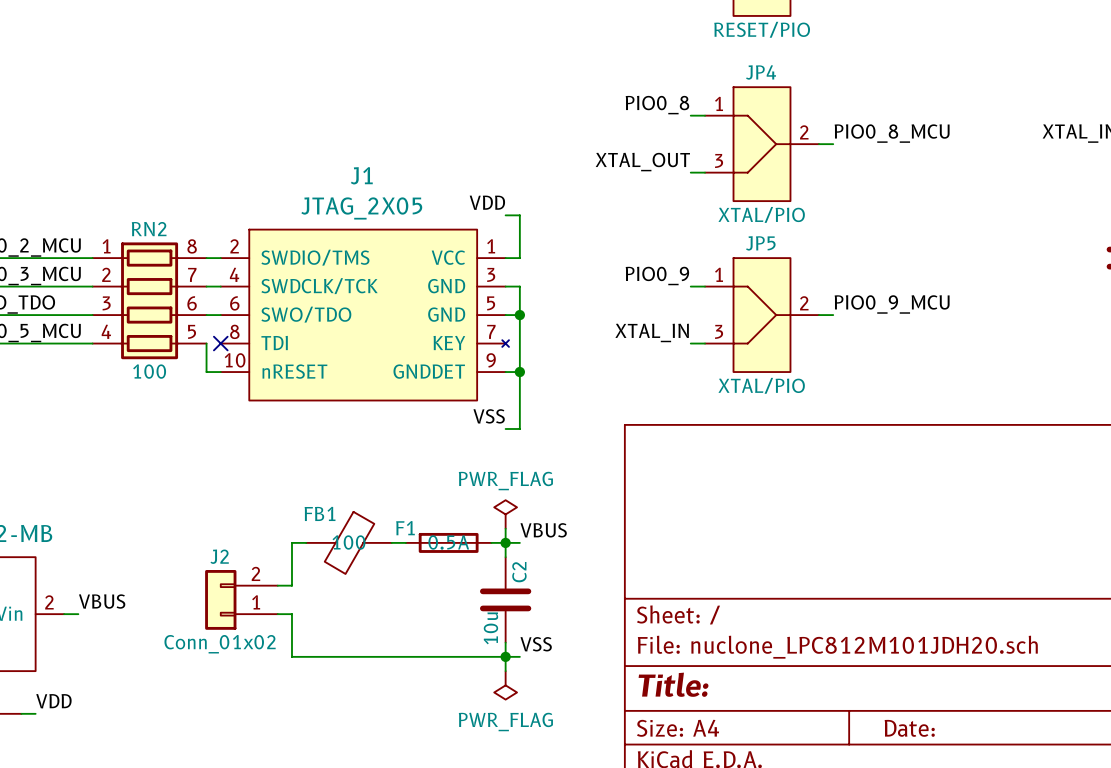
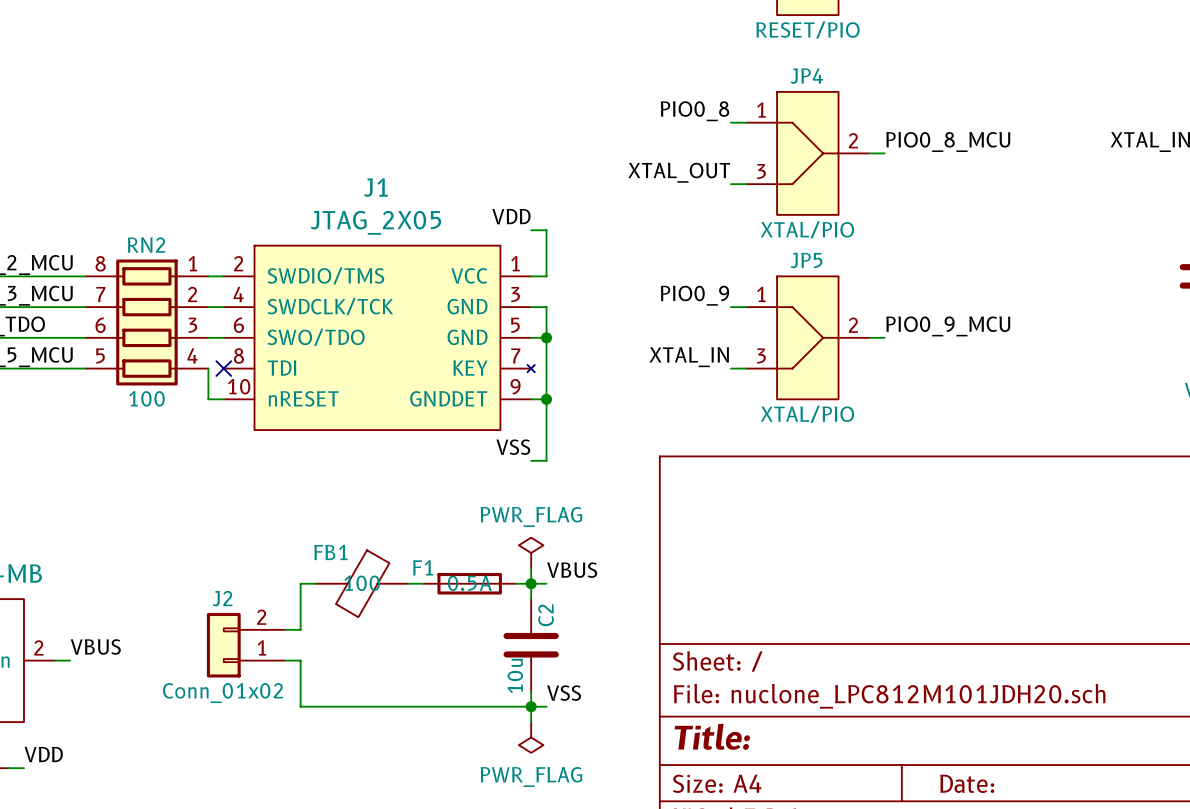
RN2 flip: as is (149, 300) -> left-right (146, 322)

